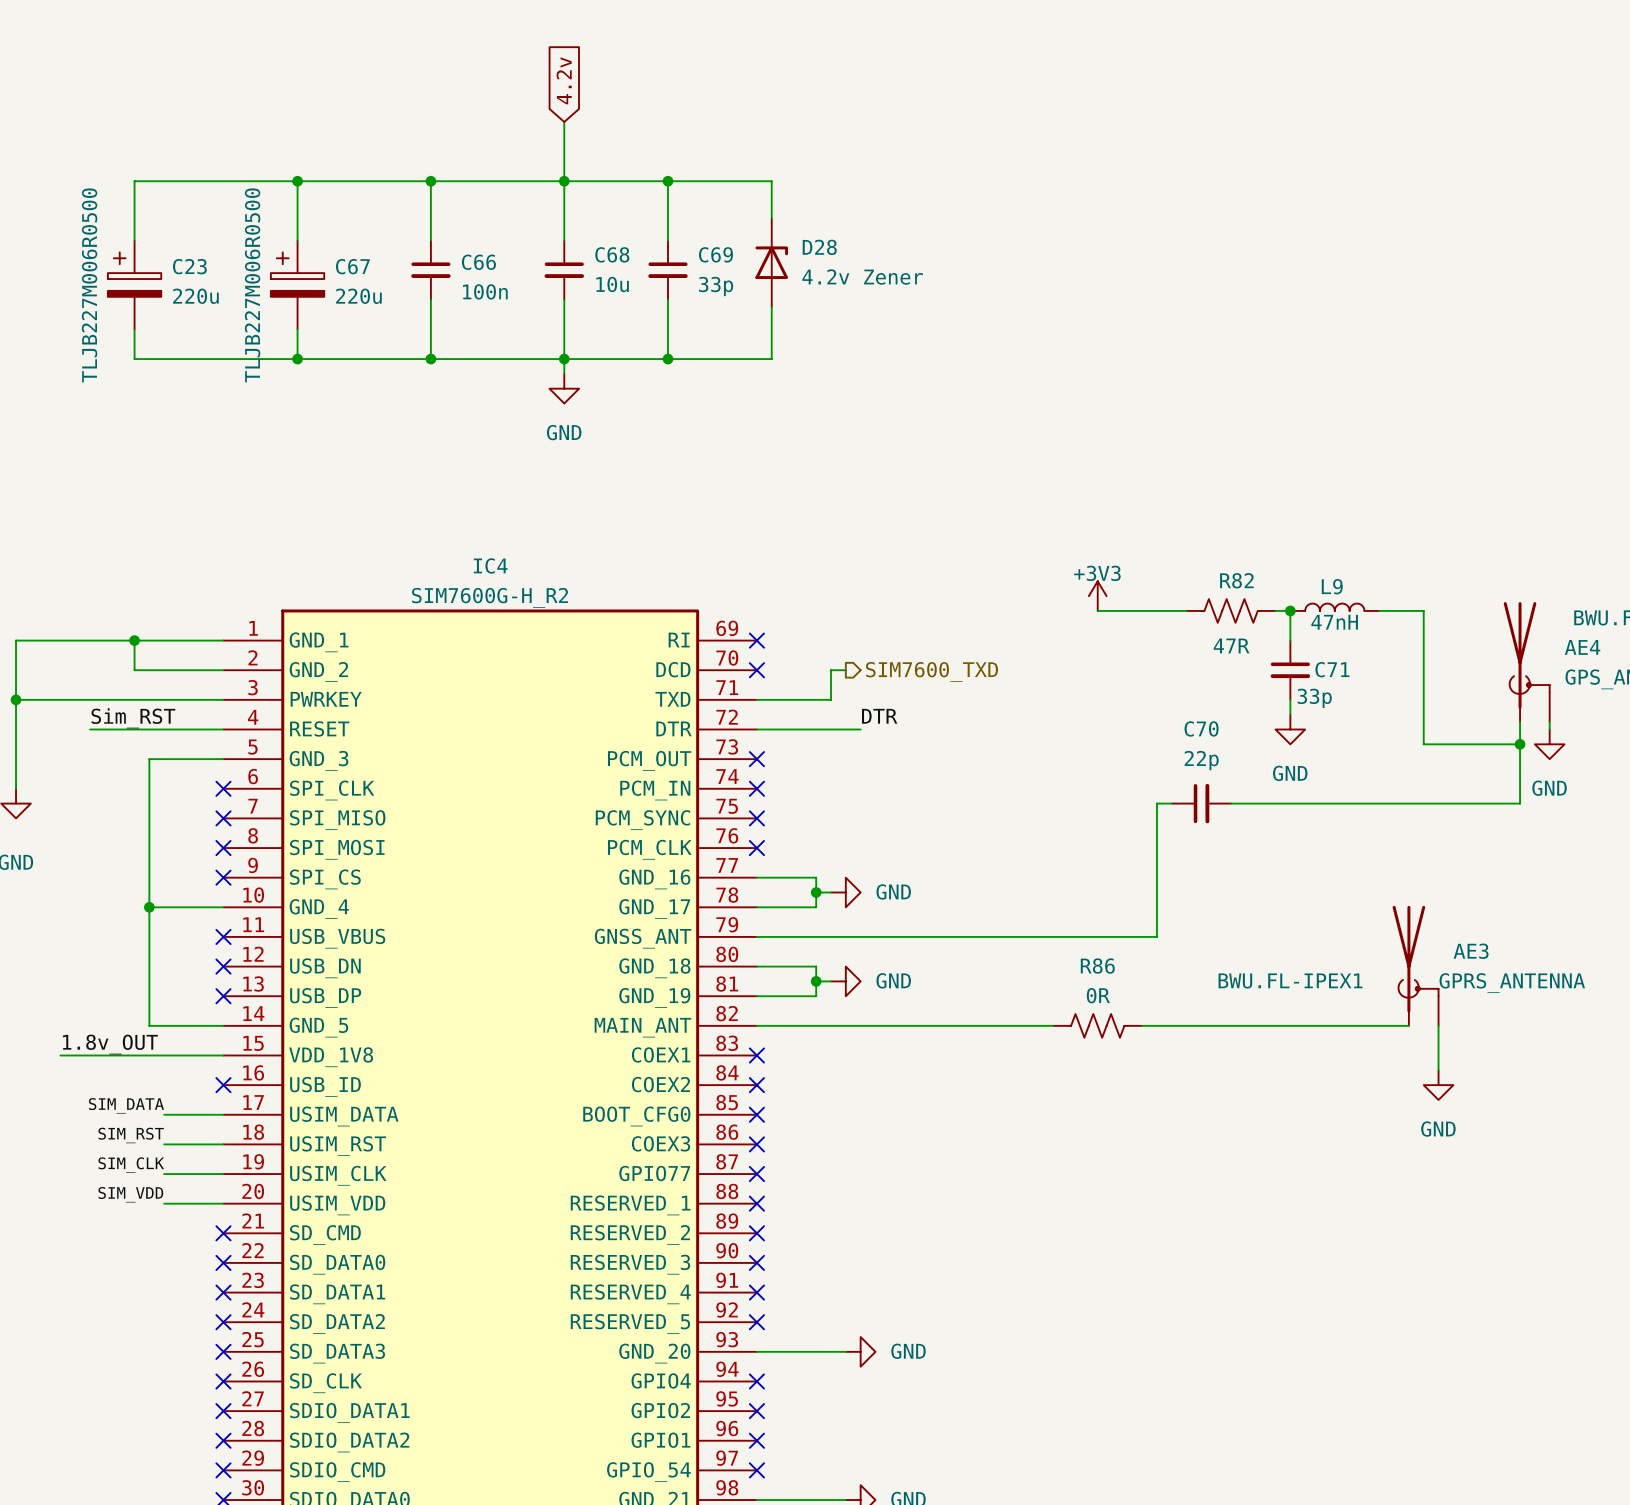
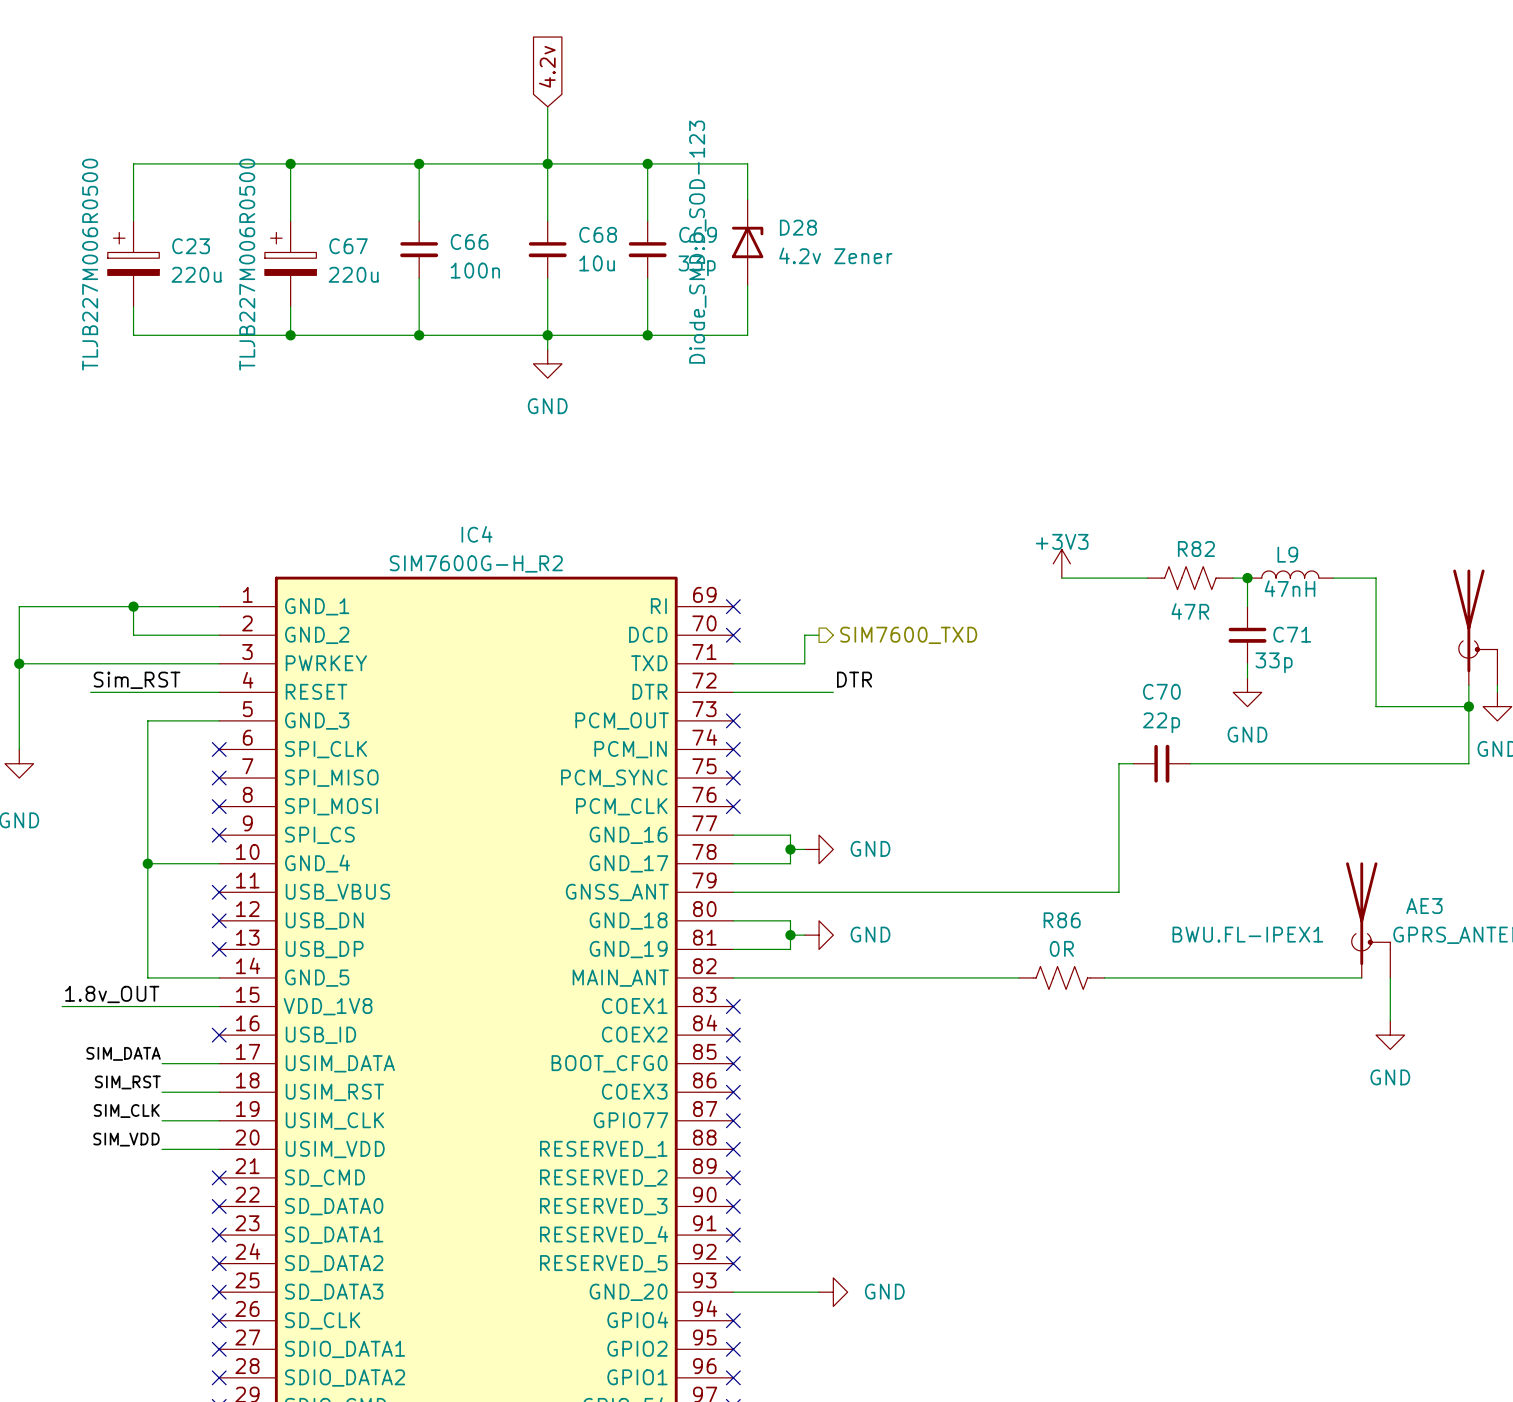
D28 text: none -> Diode_SMD:D_SOD-123 (697, 242)

